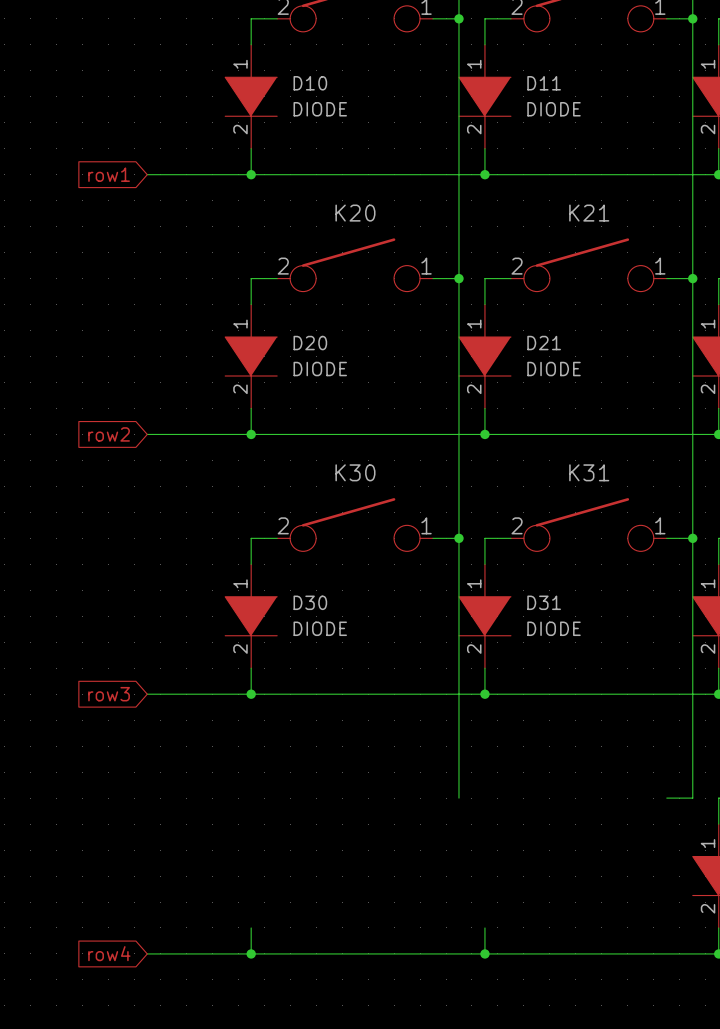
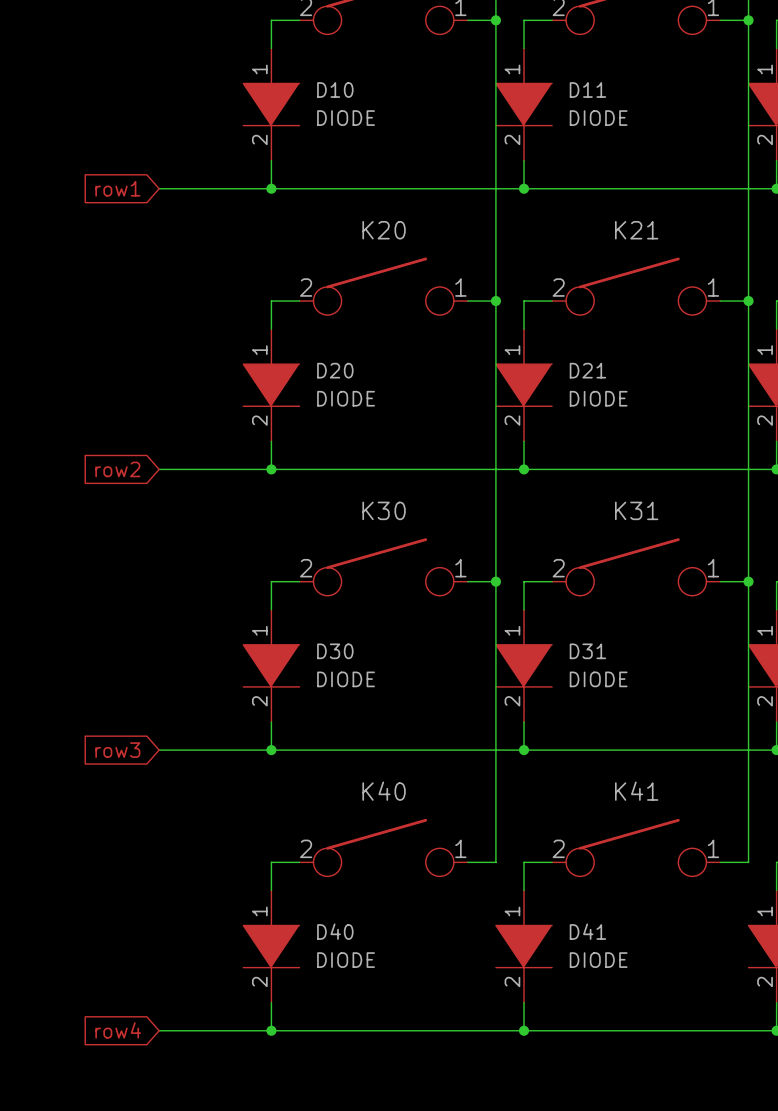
K40: none -> (383, 847)
K41: none -> (636, 847)
wire: none -> (299, 862) (271, 862) (271, 890)
wire: none -> (467, 862) (495, 862)
wire: none -> (552, 862) (524, 862) (524, 890)
D40: none -> DIODE (271, 946)
D41: none -> DIODE (524, 946)

